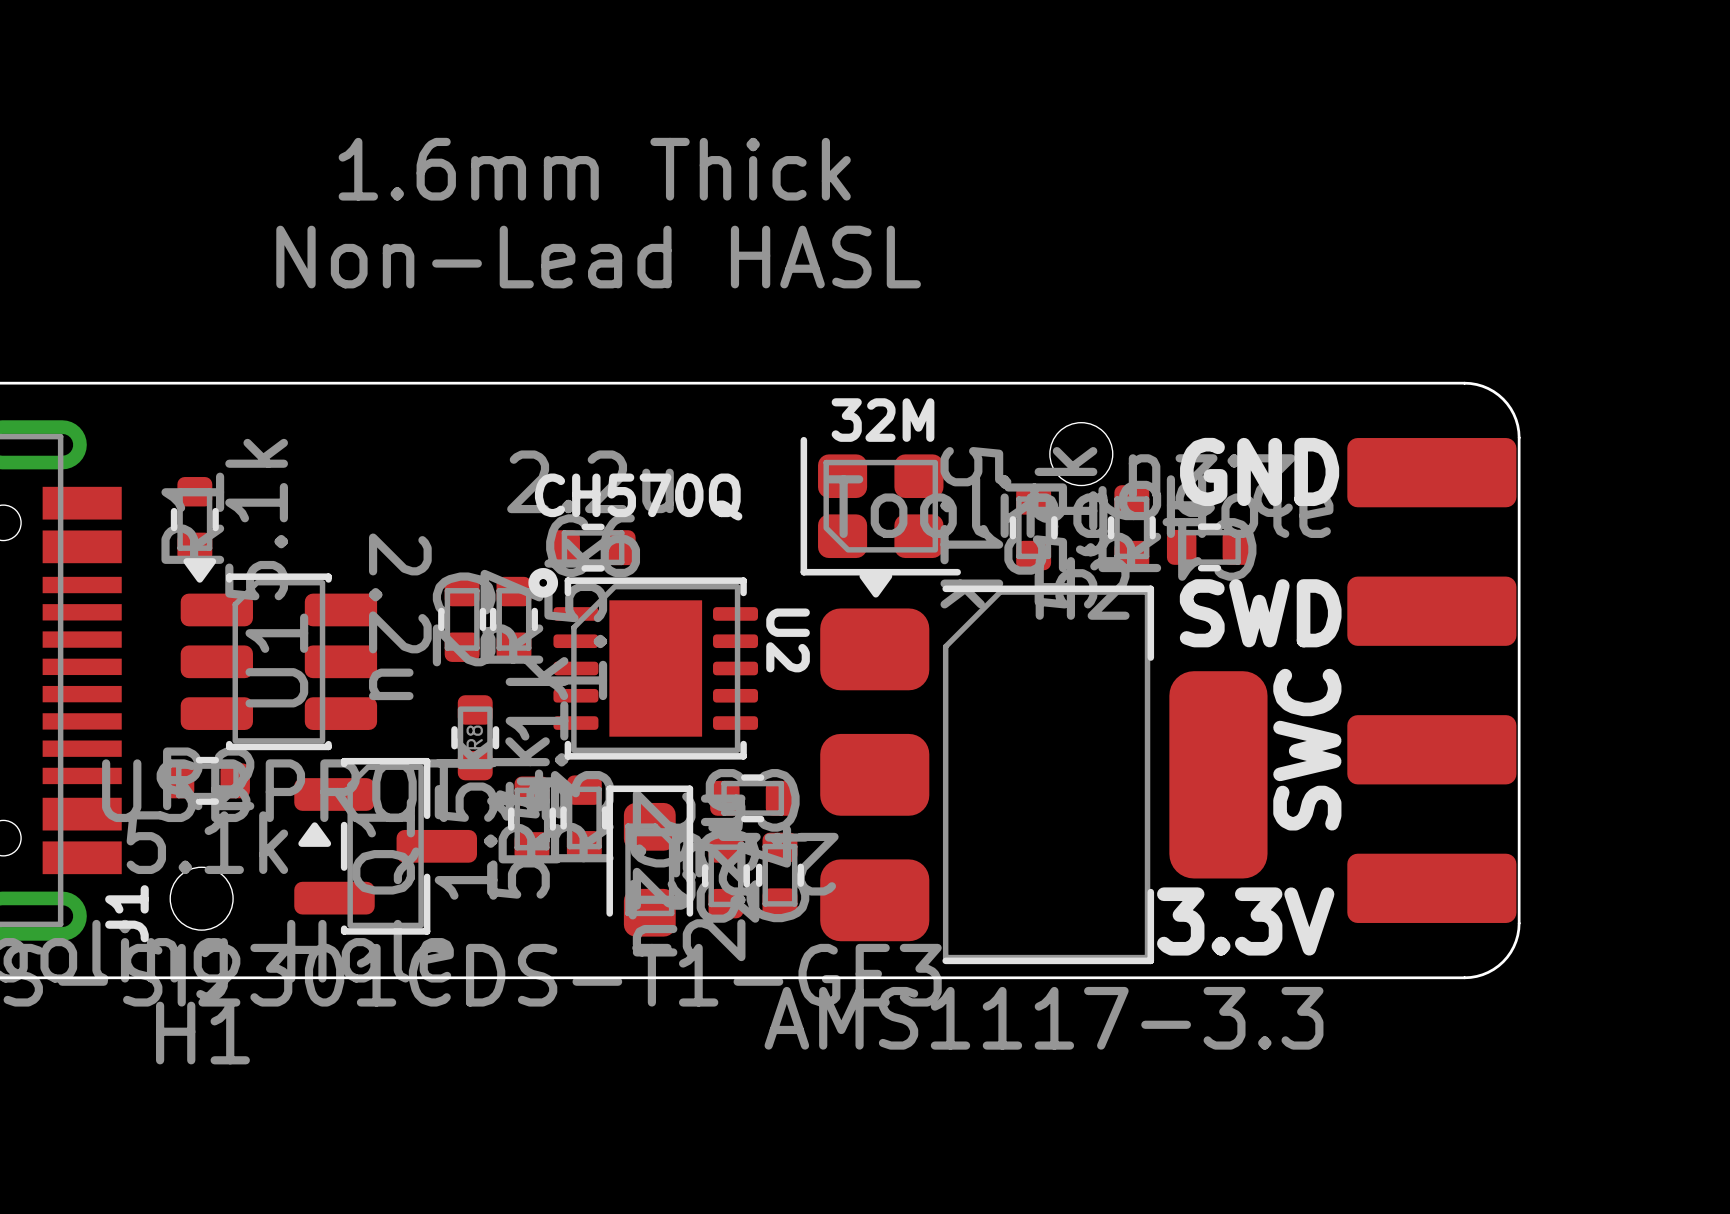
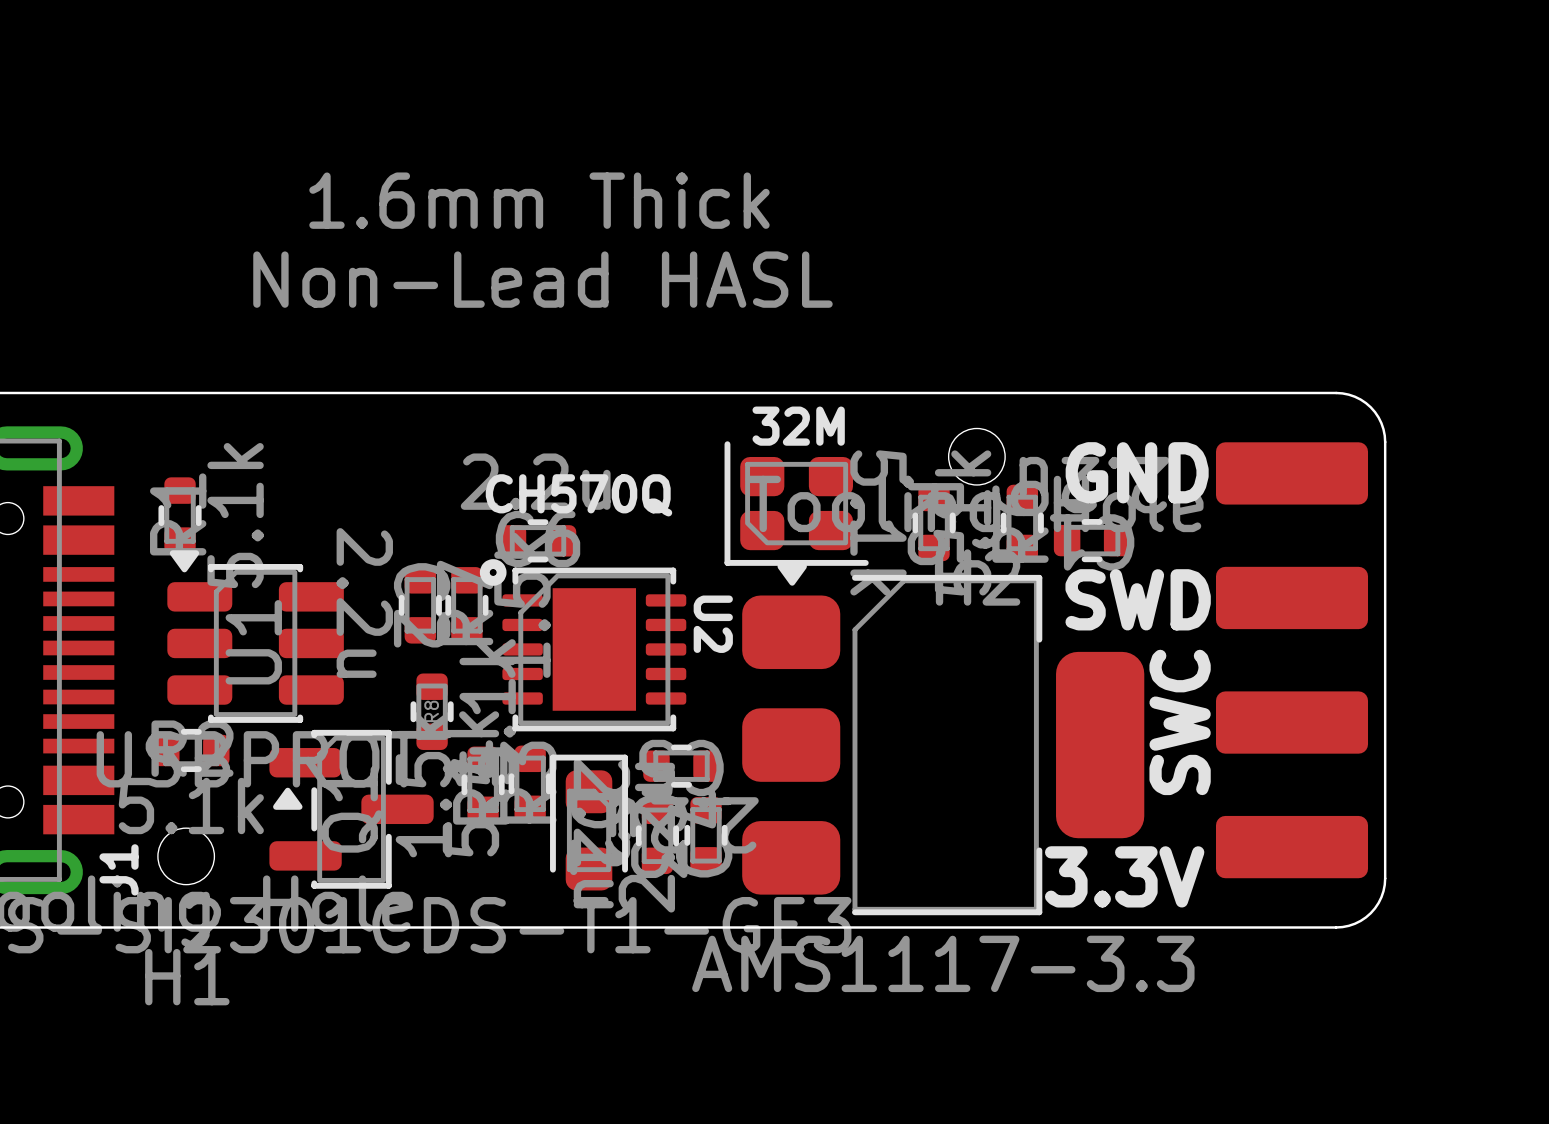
board edge: (1464, 383) (1488, 388) (1503, 399) (1516, 419) (1519, 437) (1518, 929) (1510, 952) (1498, 965) (1482, 974) (1464, 977) -> (1321, 392) (1348, 394) (1365, 403) (1378, 417) (1384, 435) (1385, 878) (1383, 891) (1378, 902) (1365, 917) (1348, 925) (1321, 927)

